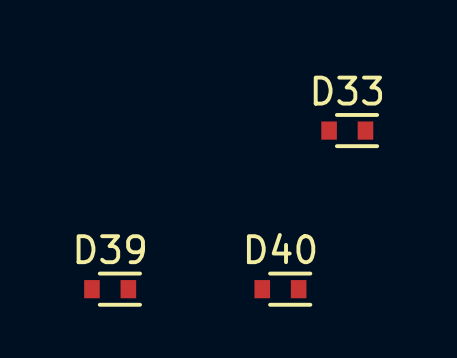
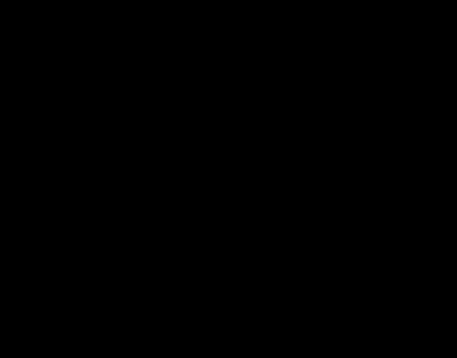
D33: (350, 130) -> none
D39: (113, 289) -> none
D40: (283, 289) -> none

